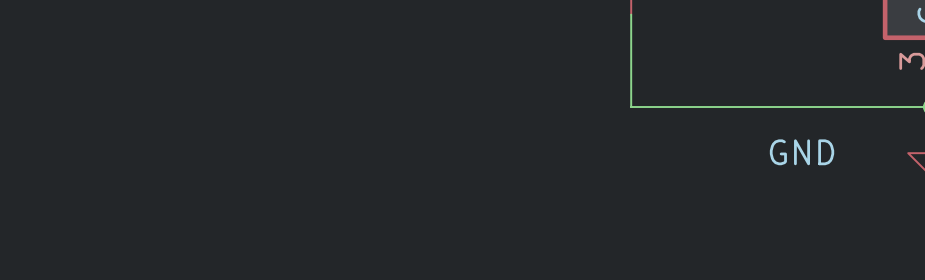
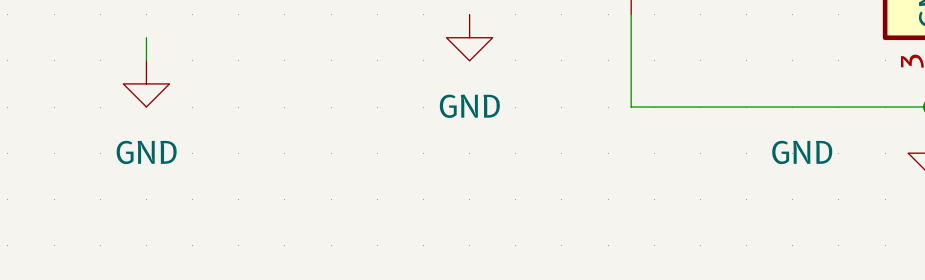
wire: none -> (146, 37) (146, 60)
power symbol: none -> GND (469, 37)
power symbol: none -> GND (146, 83)

